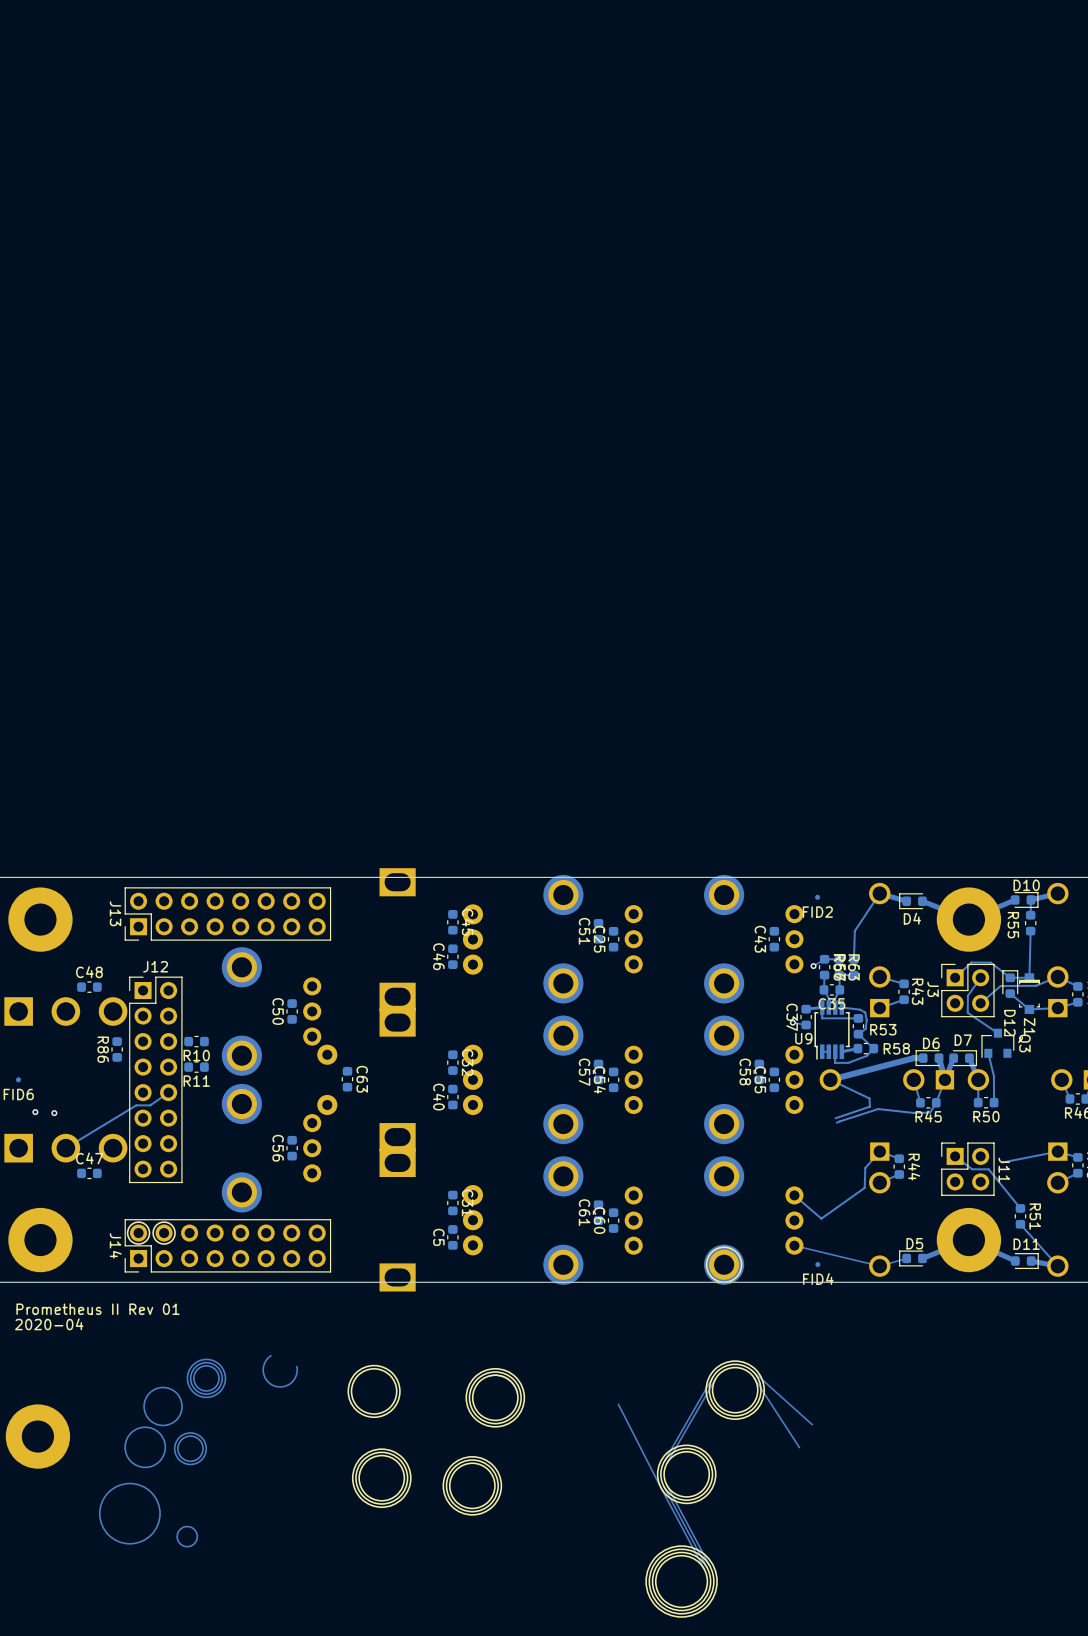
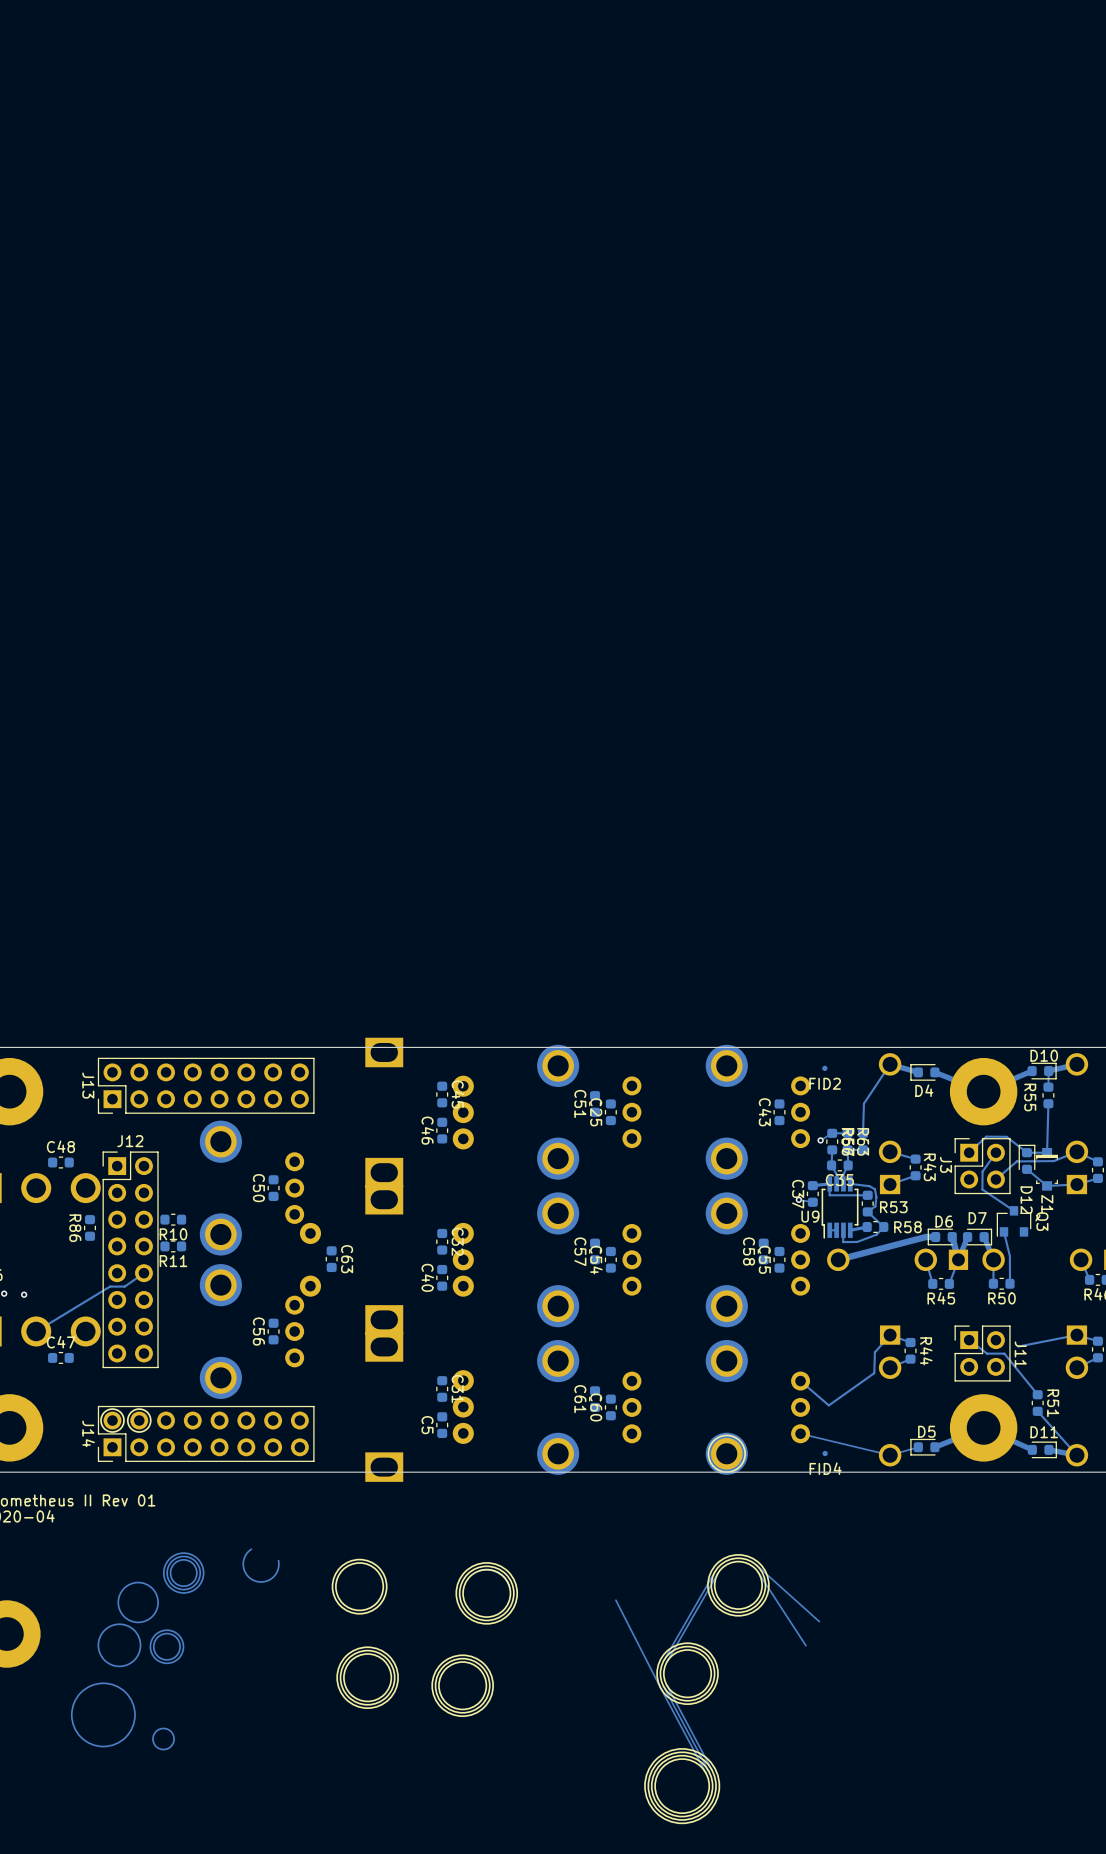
track: (830, 1079) (869, 1098) (869, 1106) (835, 1118) -> none
track: (936, 1102) (930, 1112) (913, 1112) (878, 1109) (836, 1122) -> none

